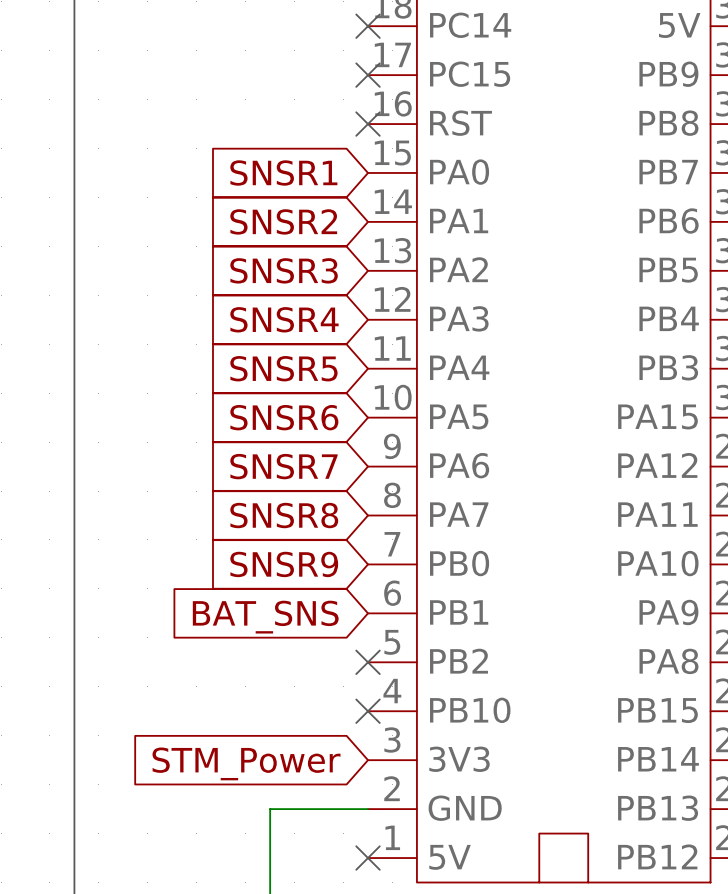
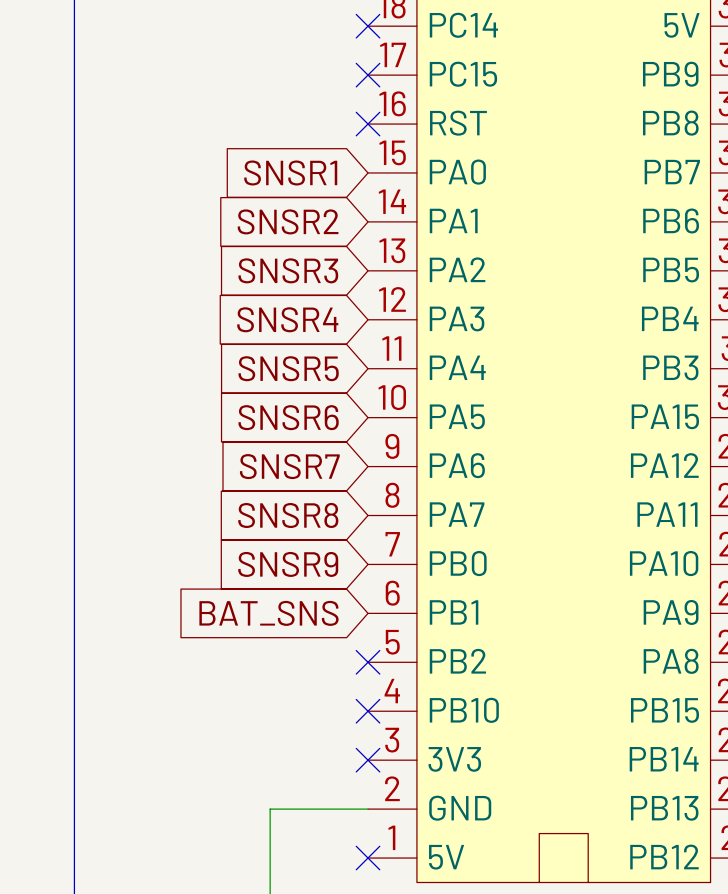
no-connect mark: none -> (368, 760)
global label: STM_Power (246, 763) -> none

